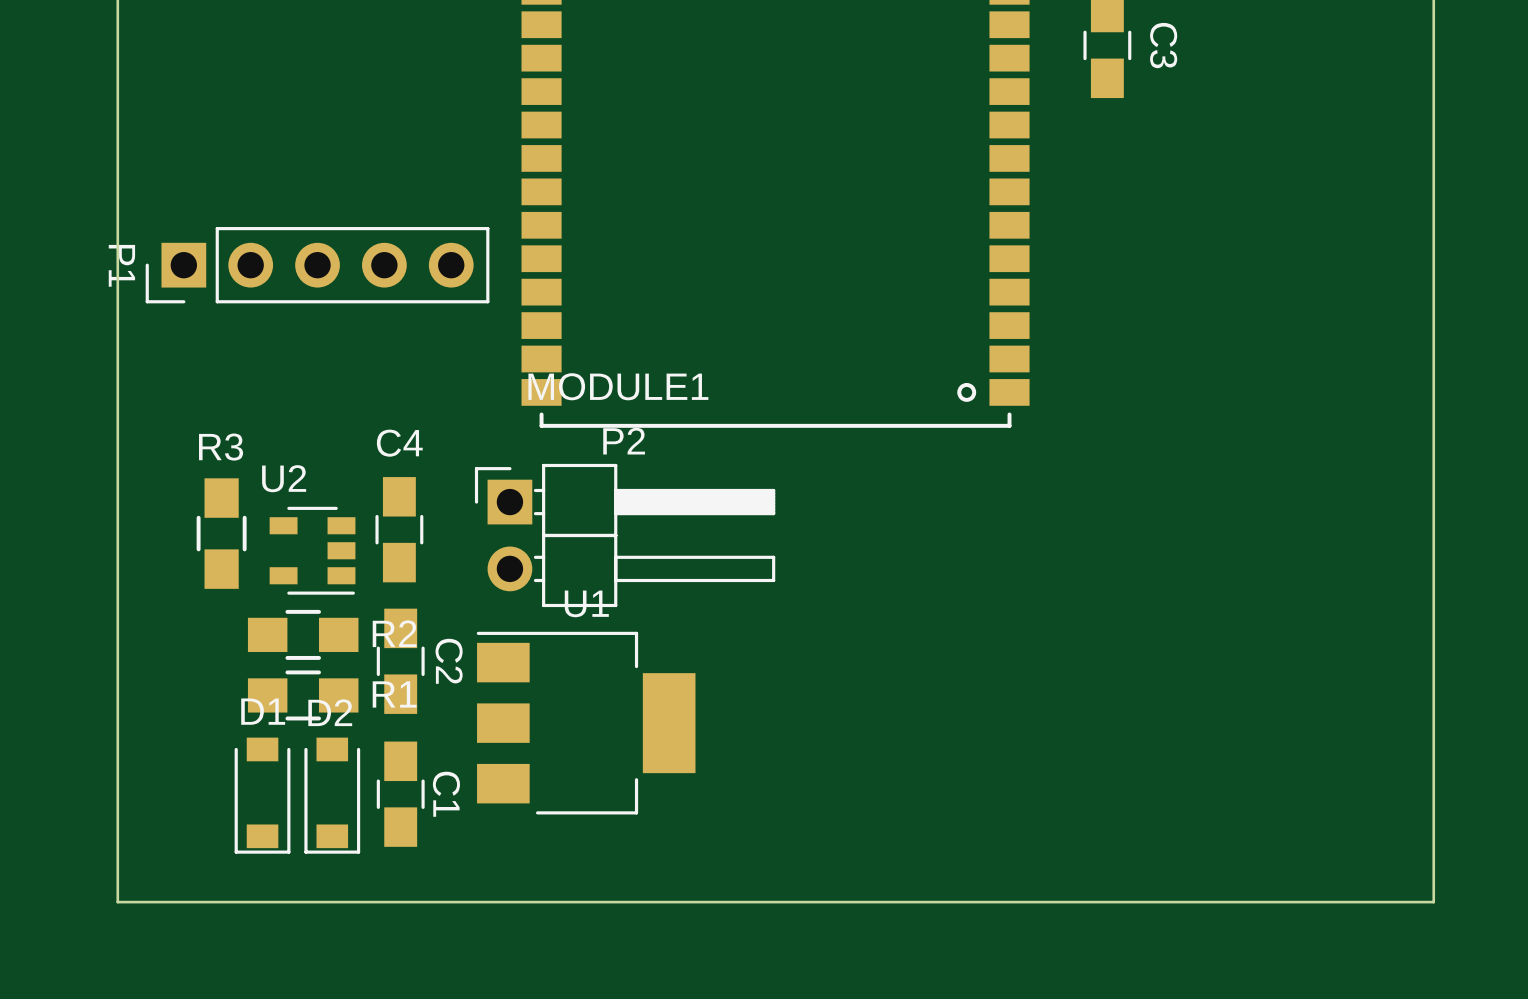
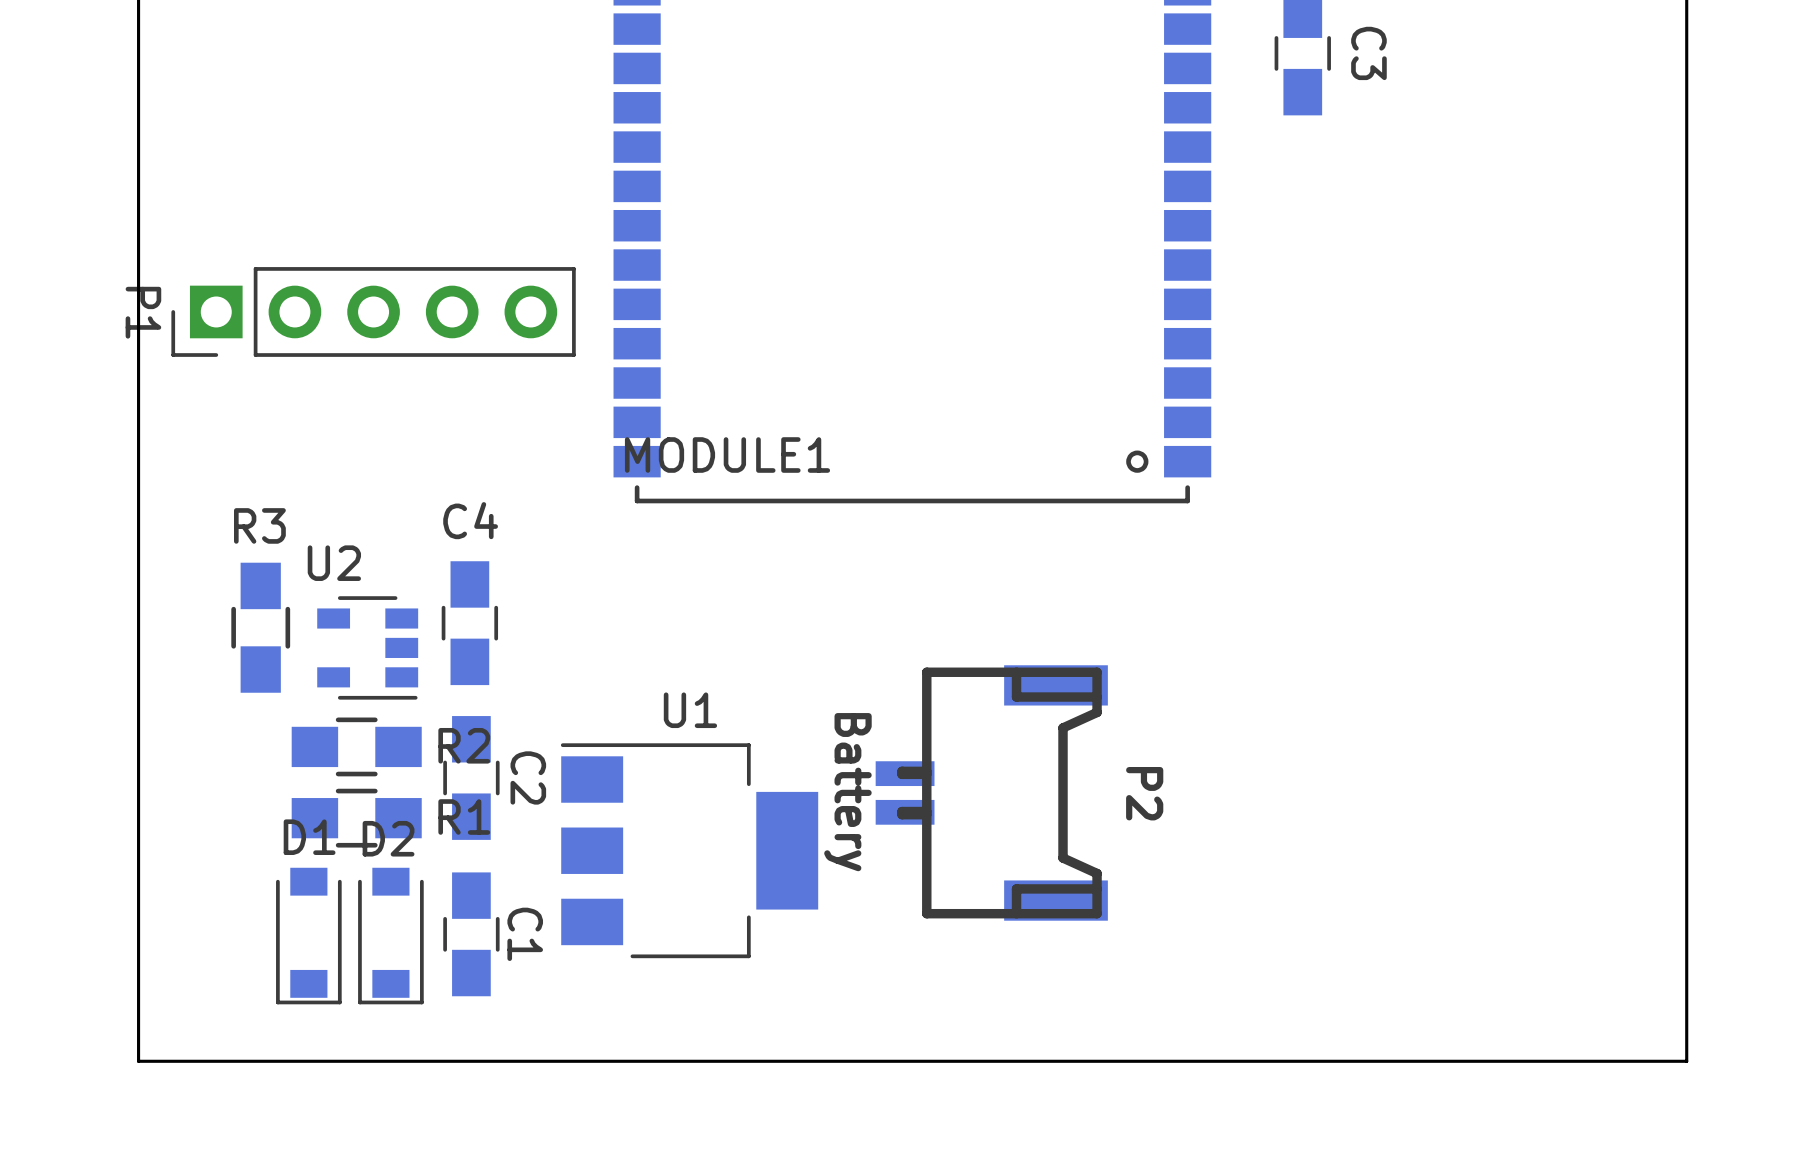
P2 name position: P2 (624, 441) -> P2 (1144, 793)
P2 footprint: [474, 463, 776, 608] -> [875, 665, 1108, 921]
P2 value: none -> Battery (847, 792)

